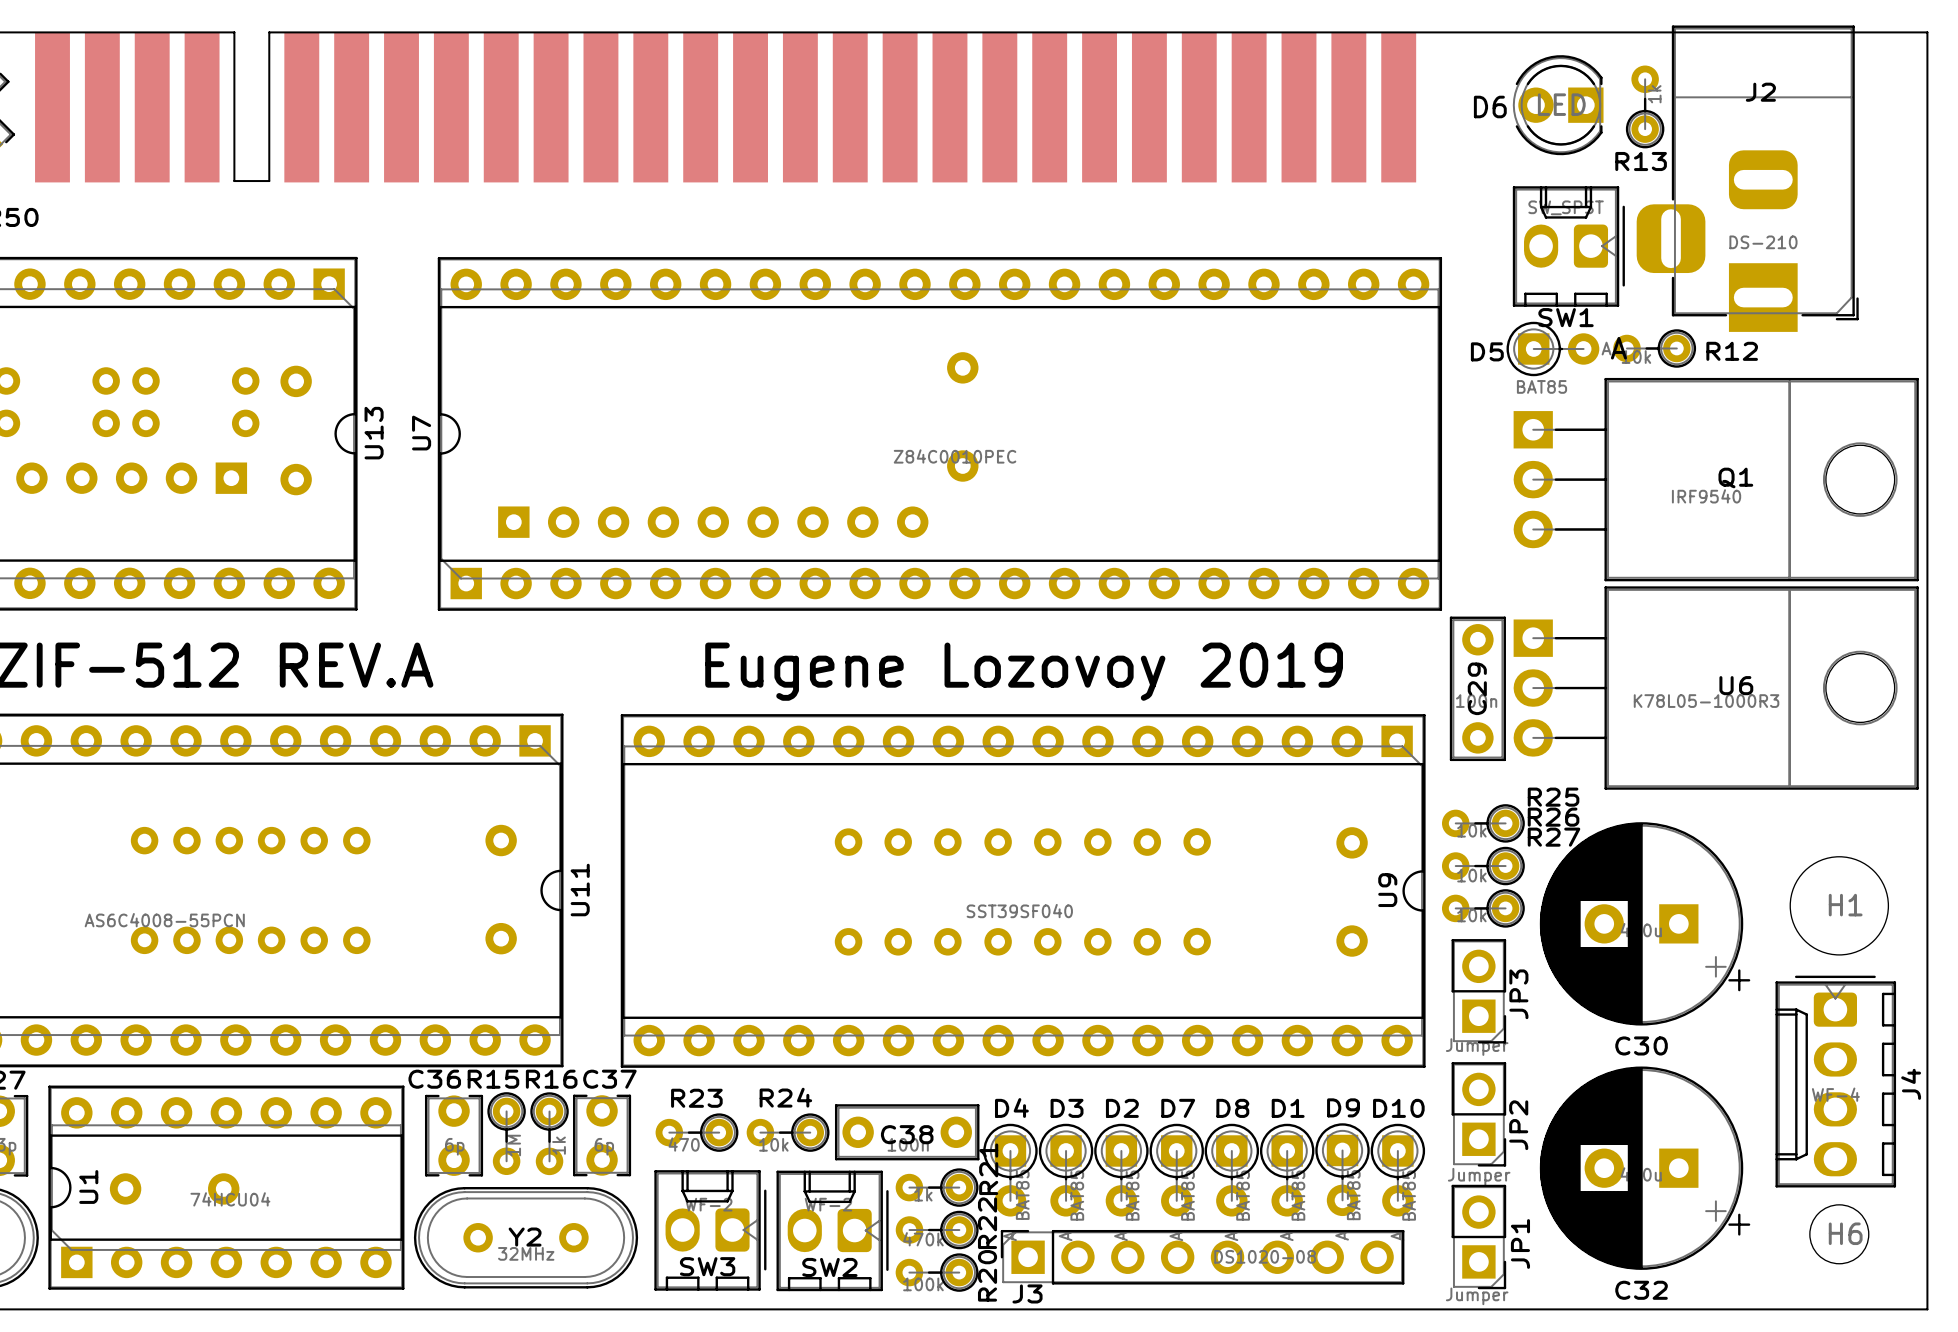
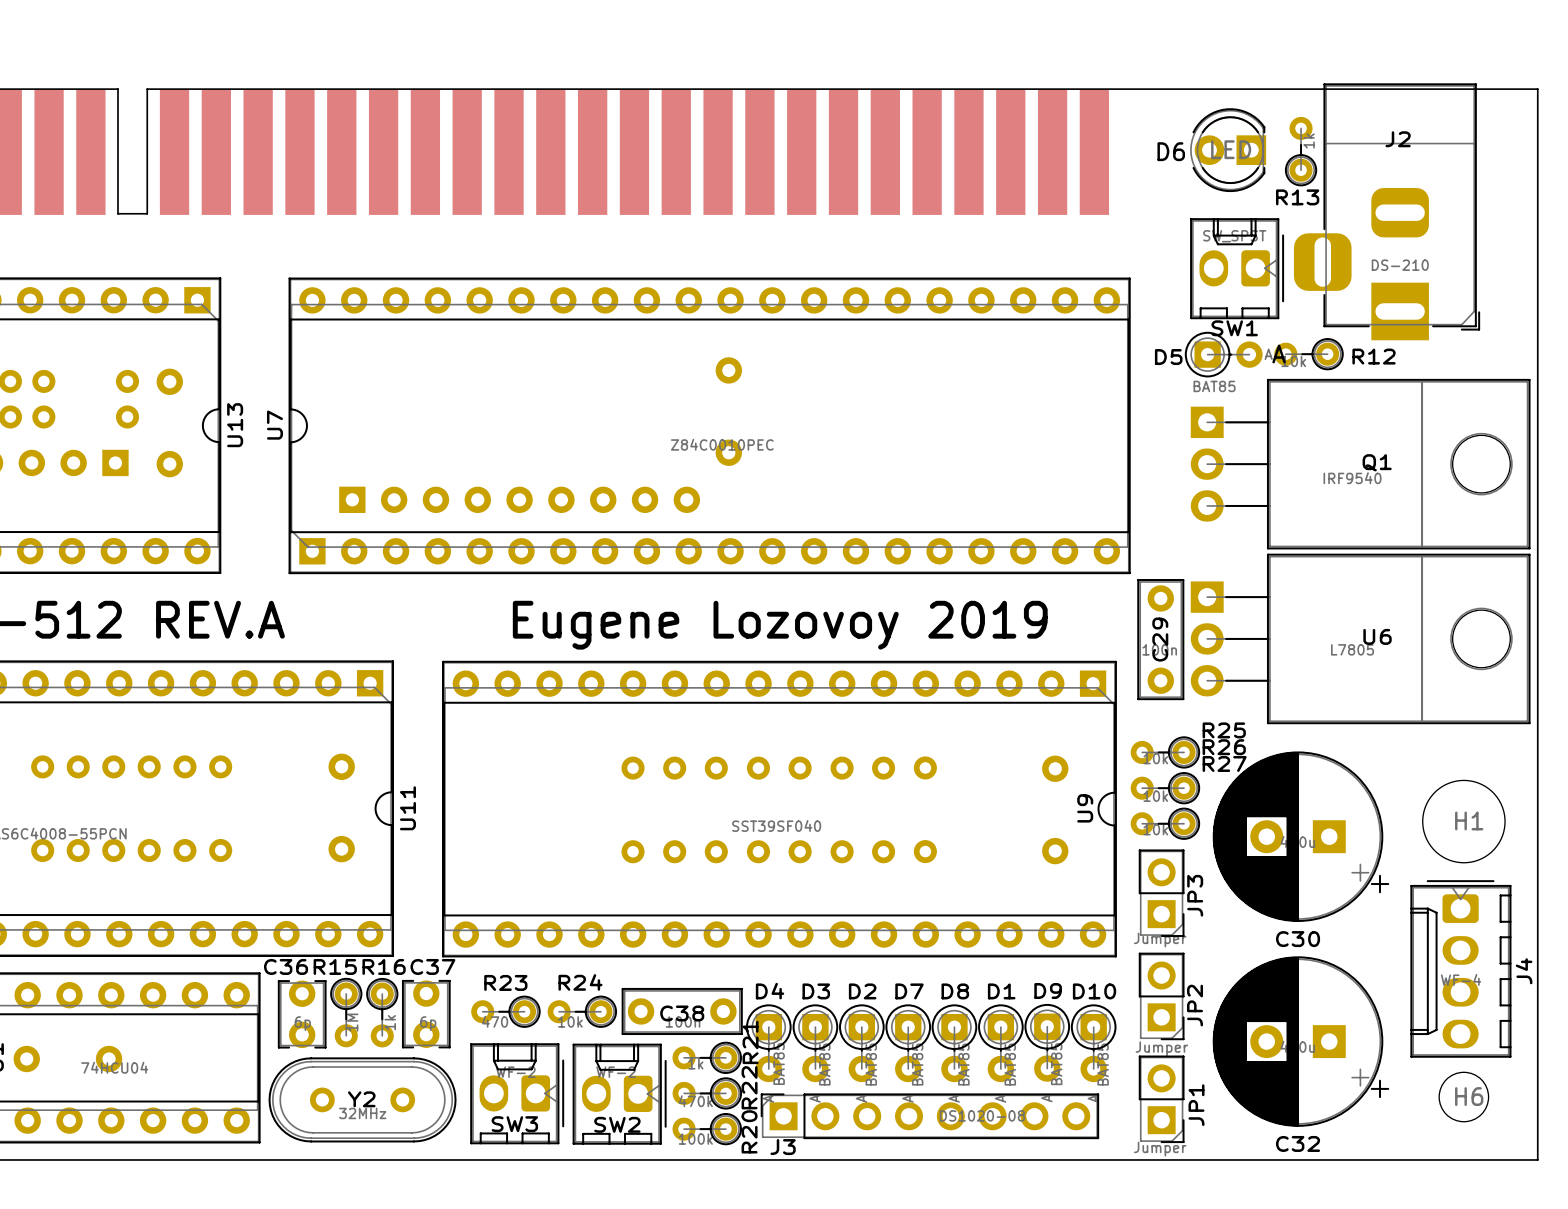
U6 value: K78L05-1000R3 (1706, 701) -> L7805 (1352, 649)

